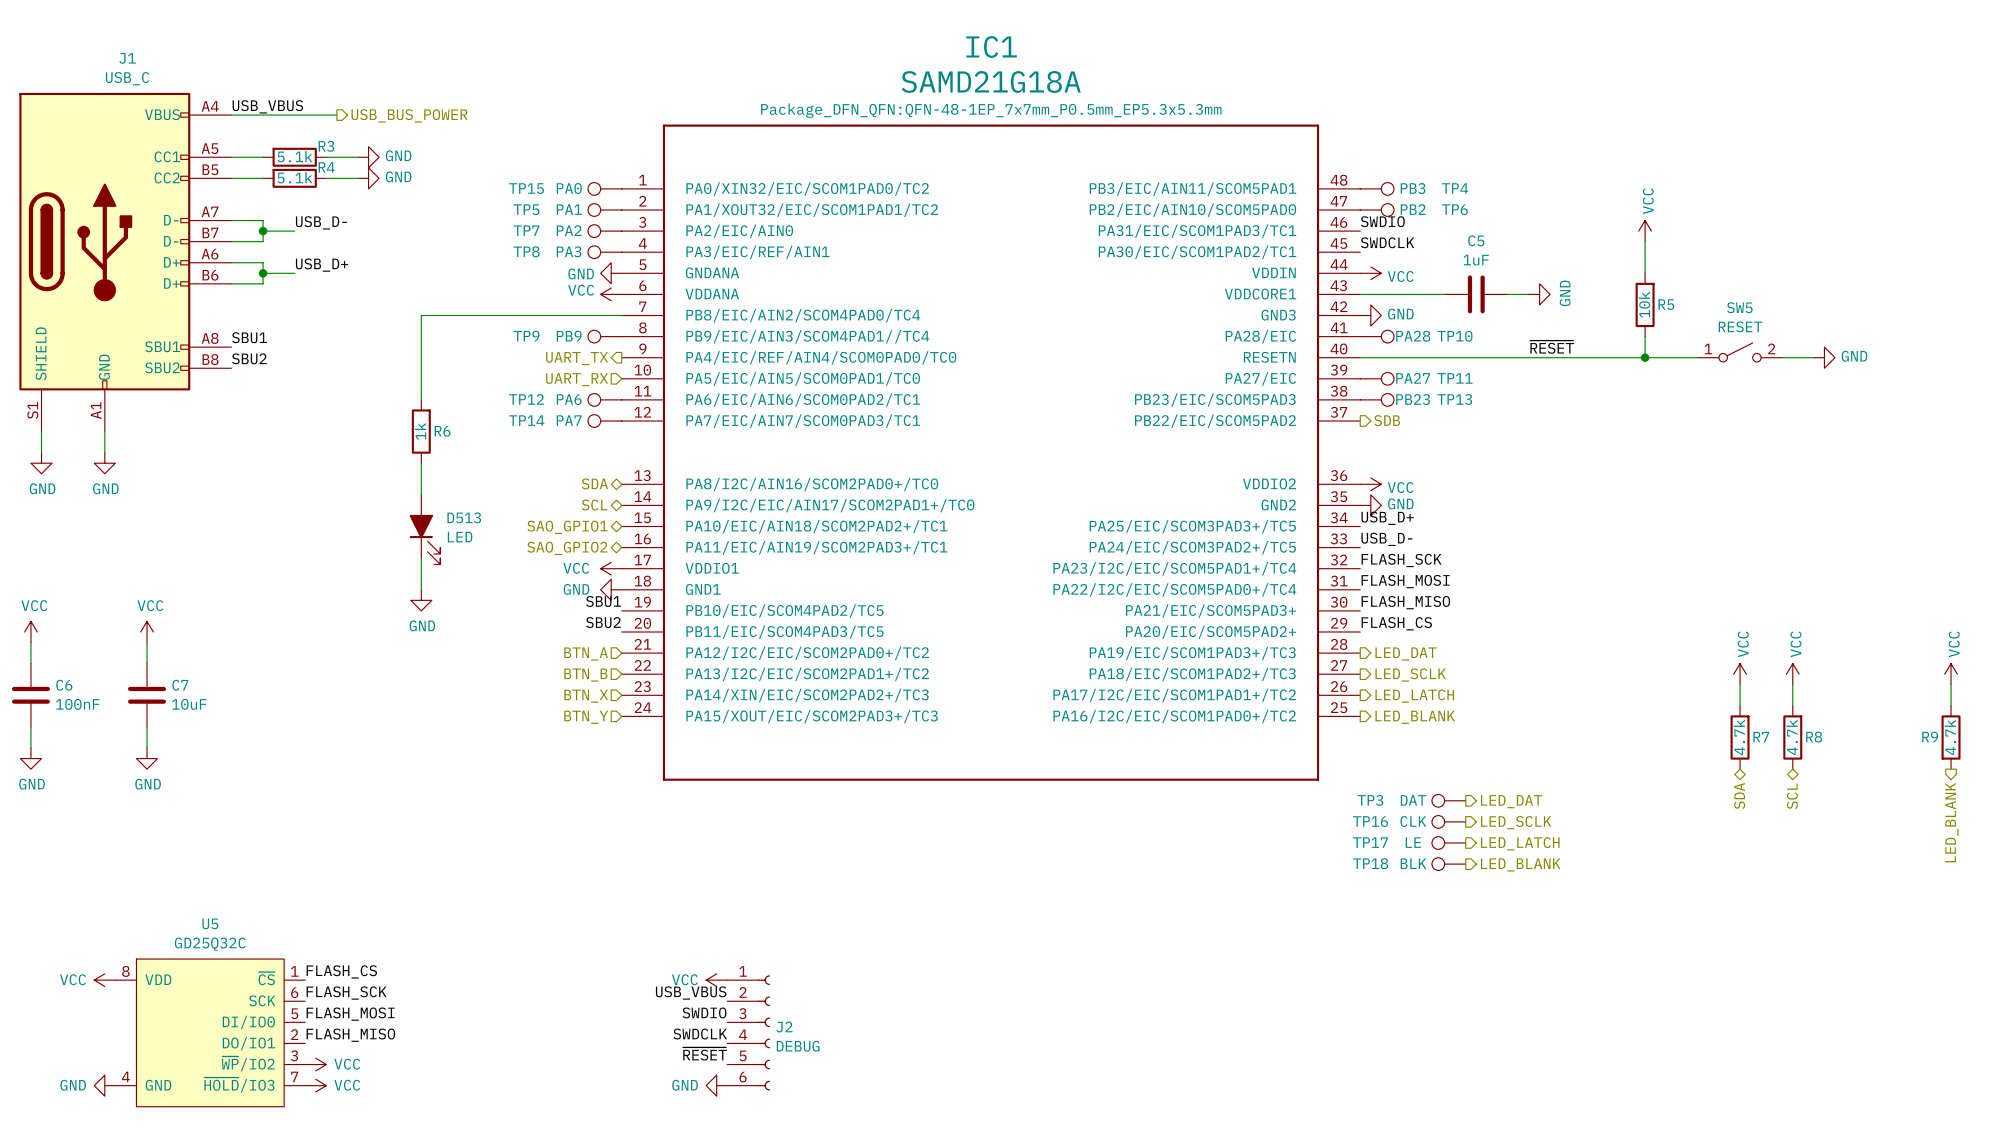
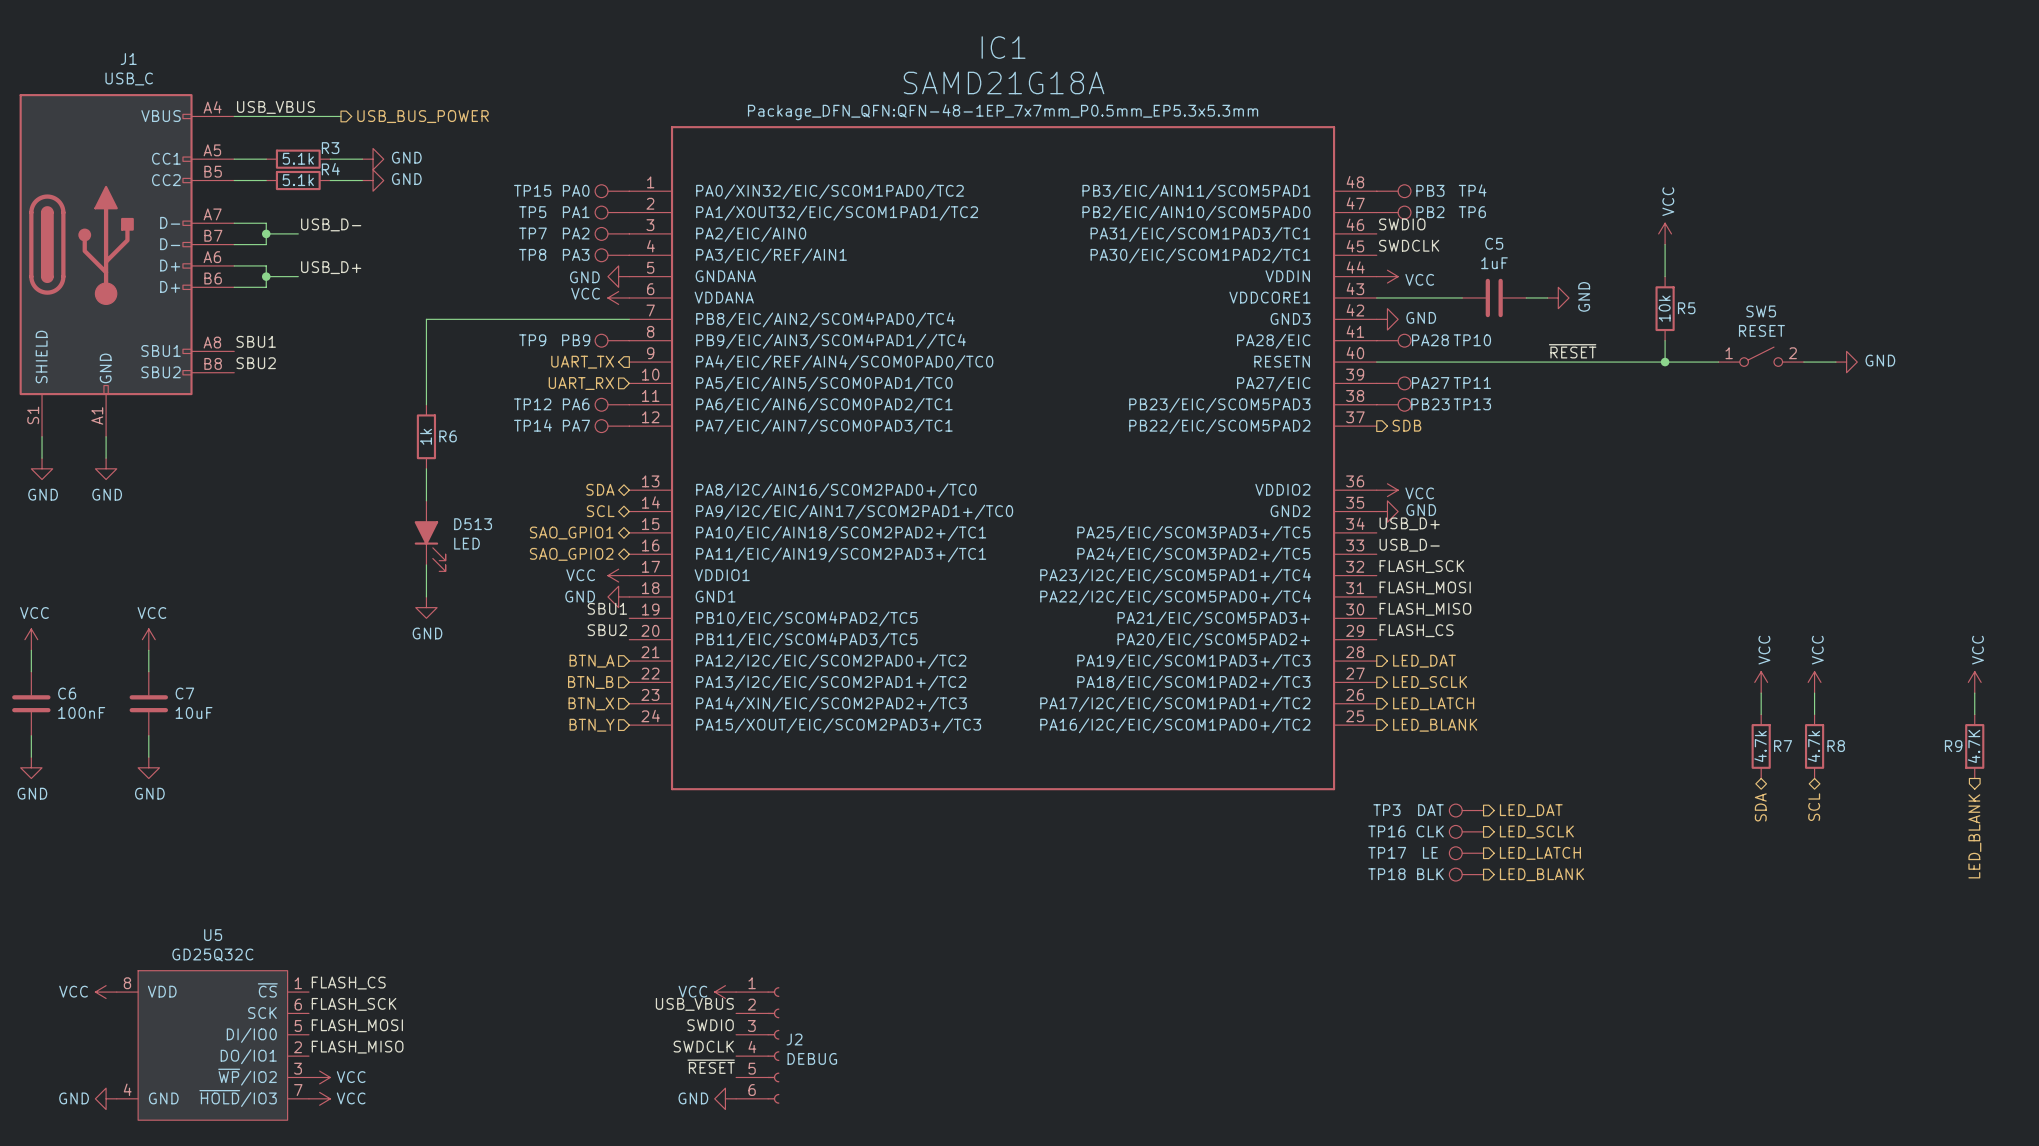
R9 value: 4.7k (1950, 737) -> 4.7K (1974, 746)

